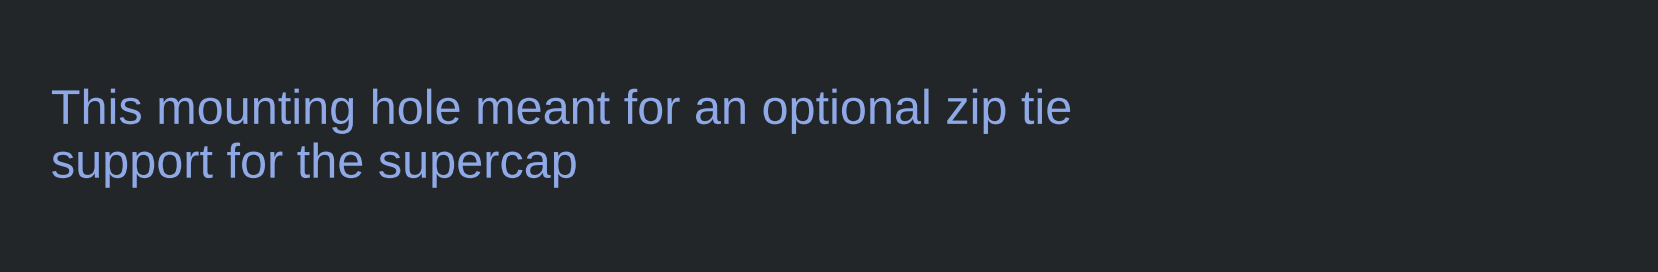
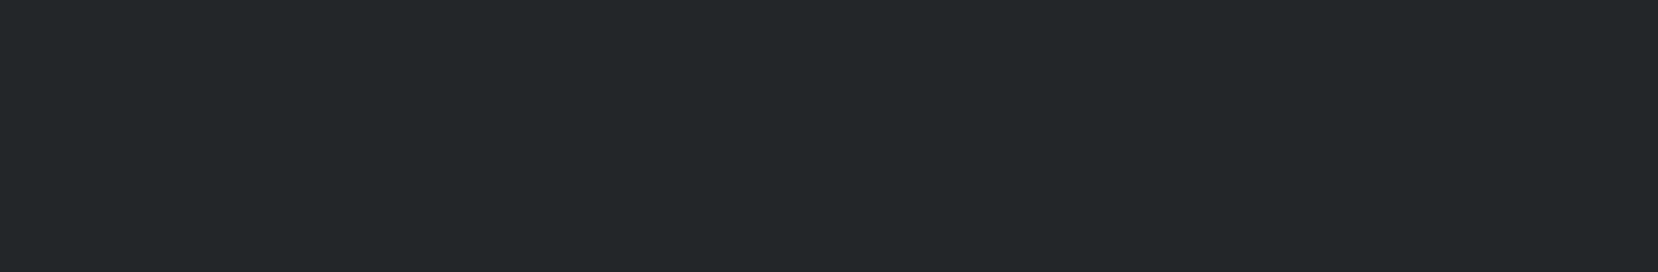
text: This mounting hole meant for an optional zip tie (561, 111) -> none
text: support for the supercap (313, 165) -> none

